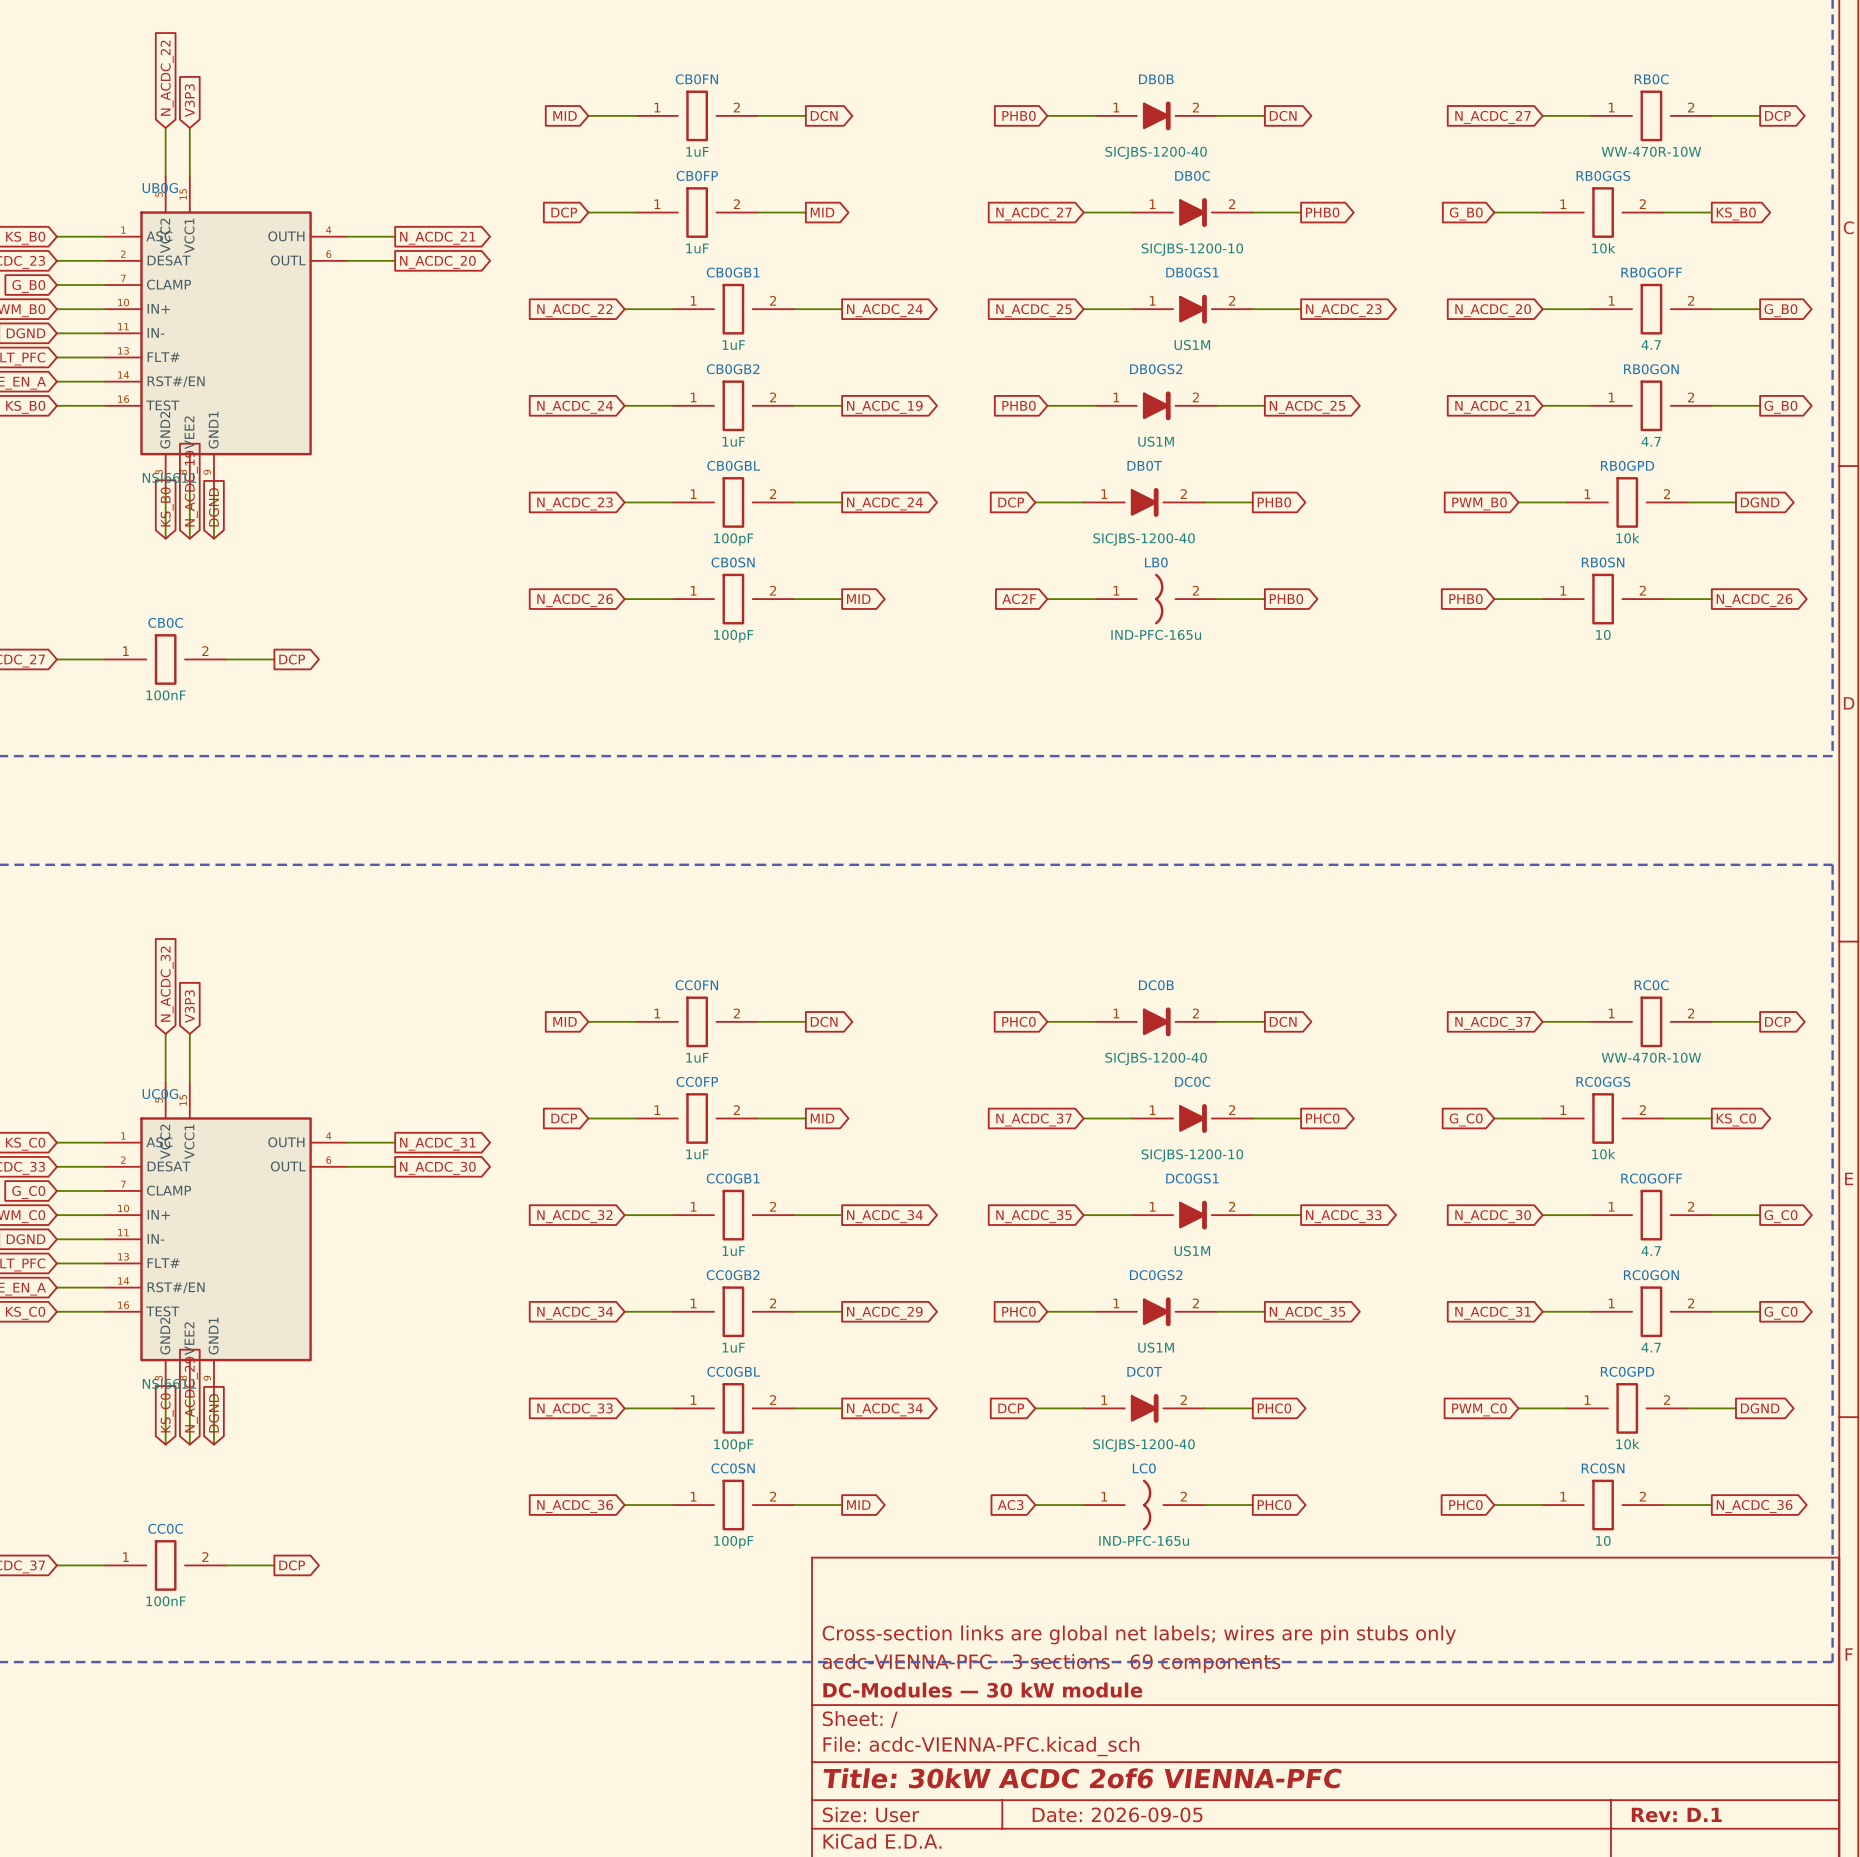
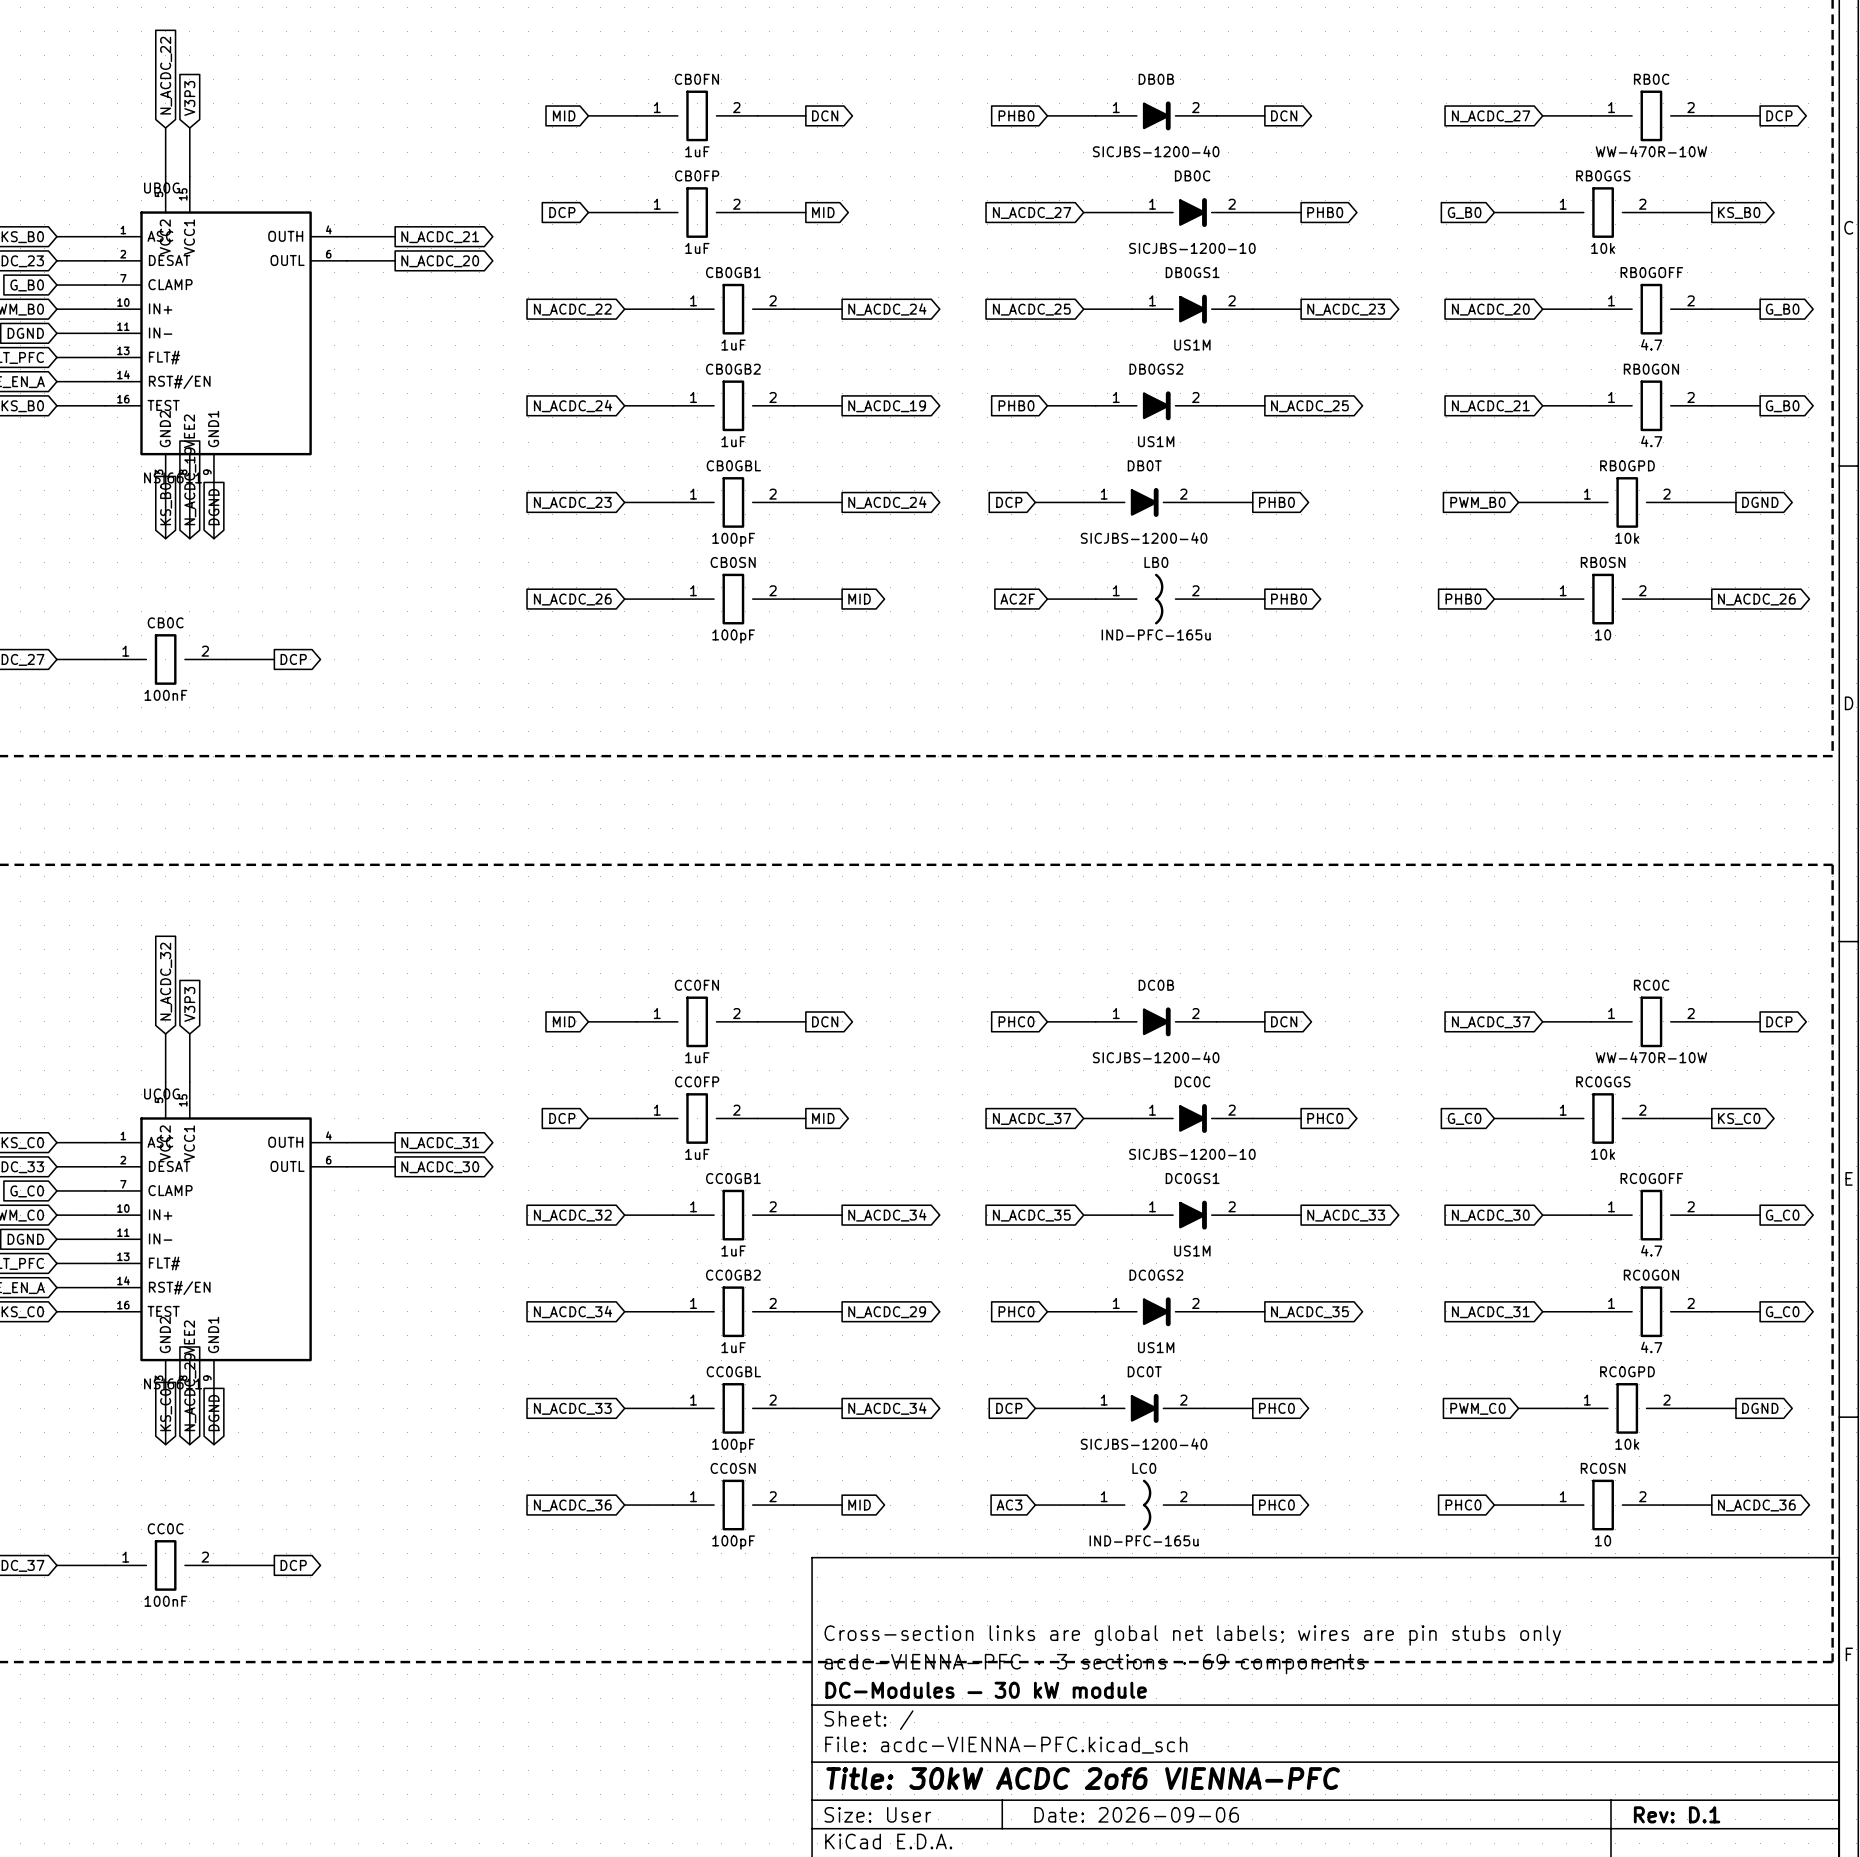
title block: Date: 2026-09-05 (1117, 1814) -> Date: 2026-09-06 (1136, 1814)

